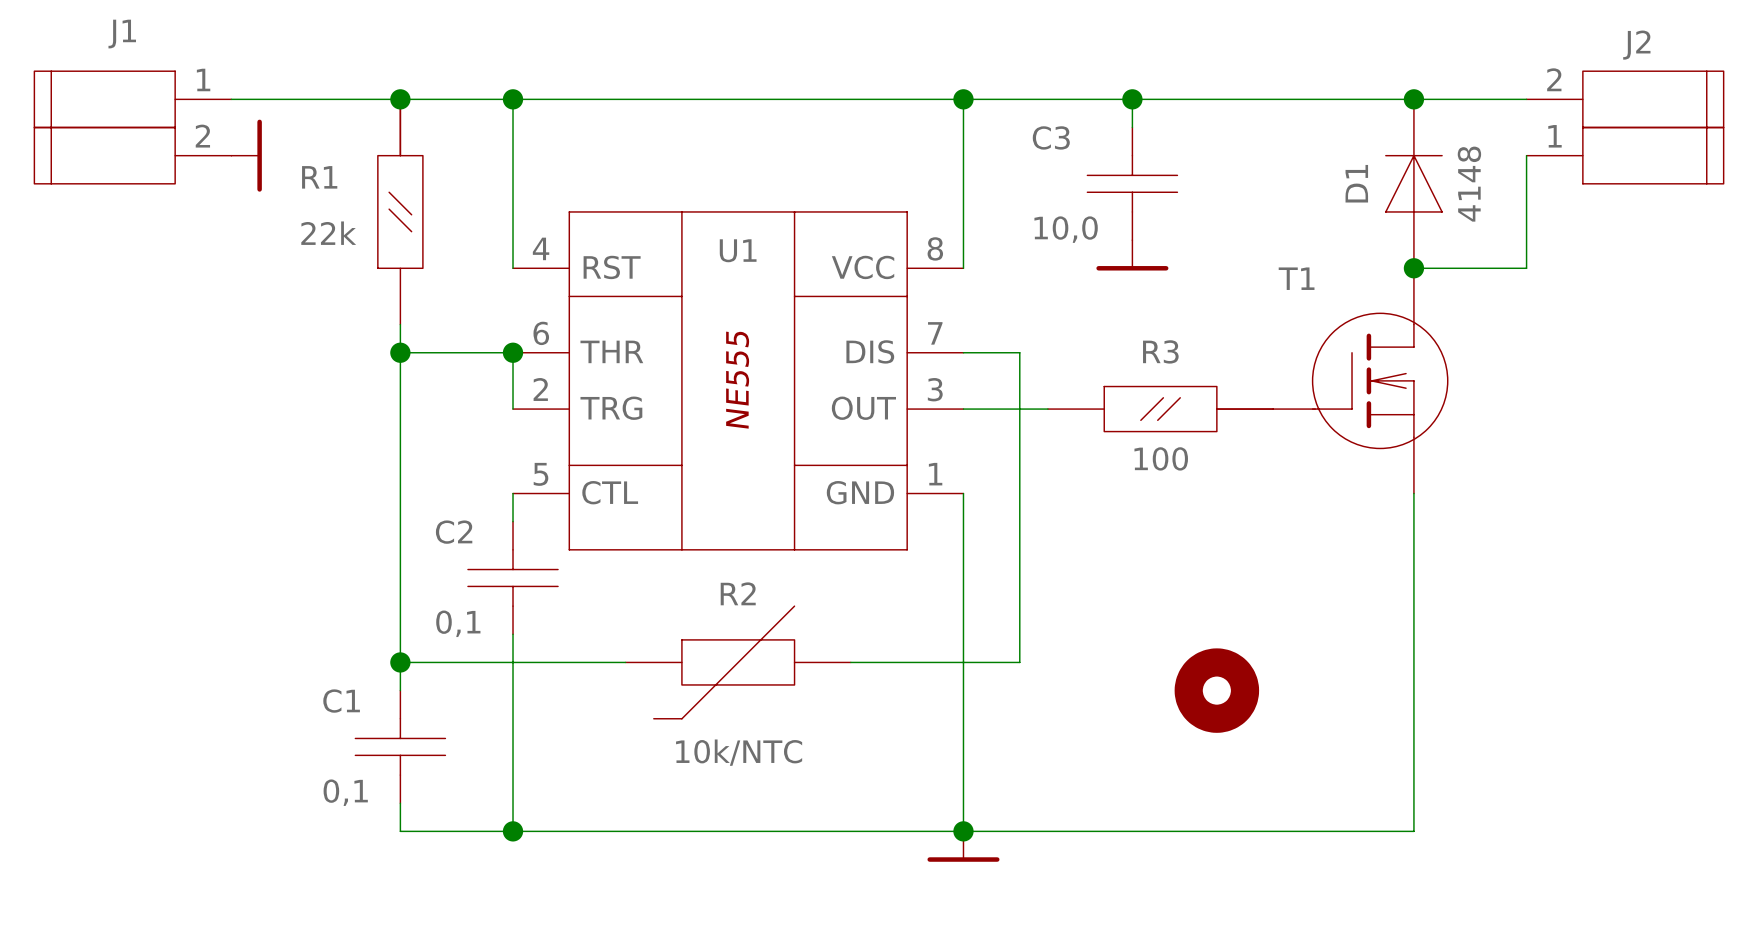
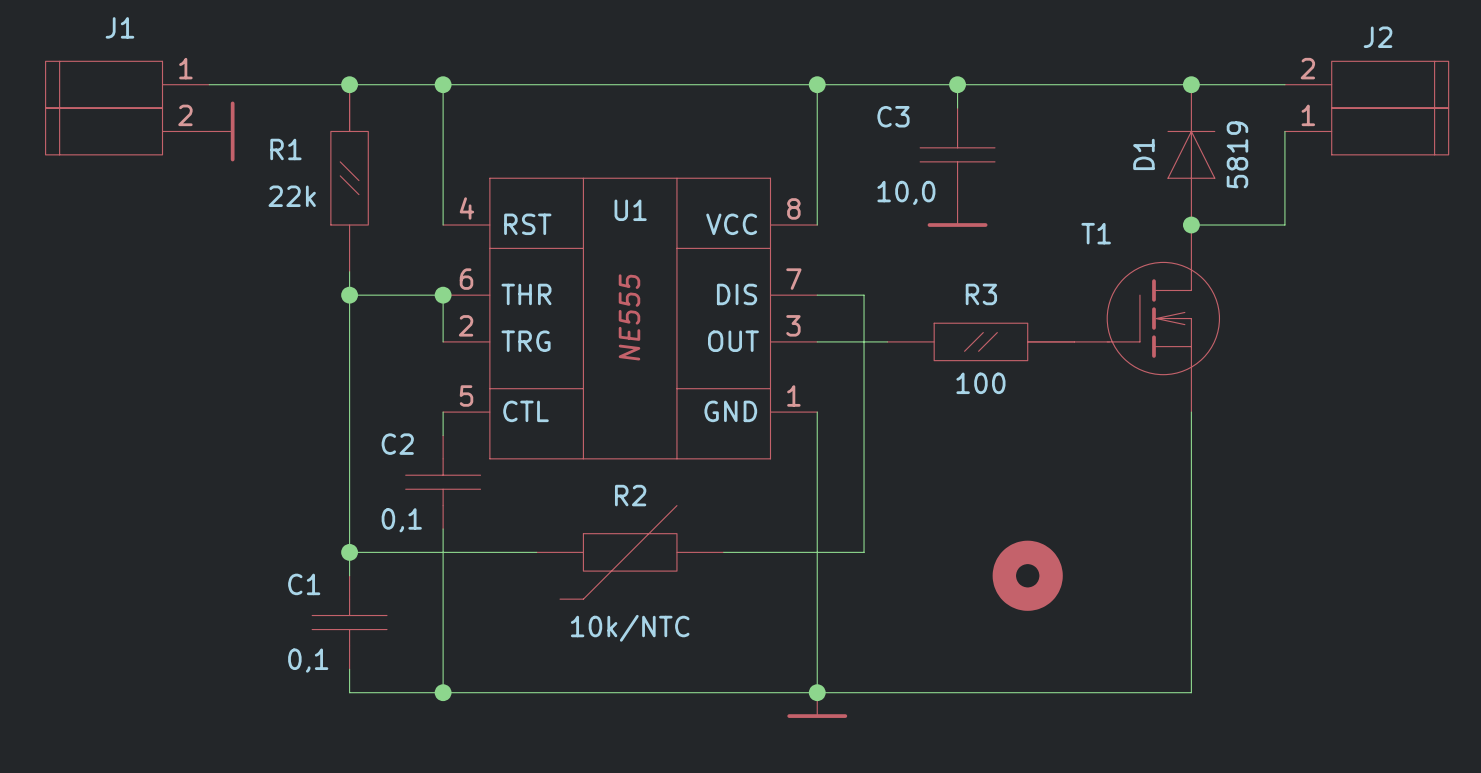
D1 value: 4148 (1469, 184) -> 5819 (1237, 154)

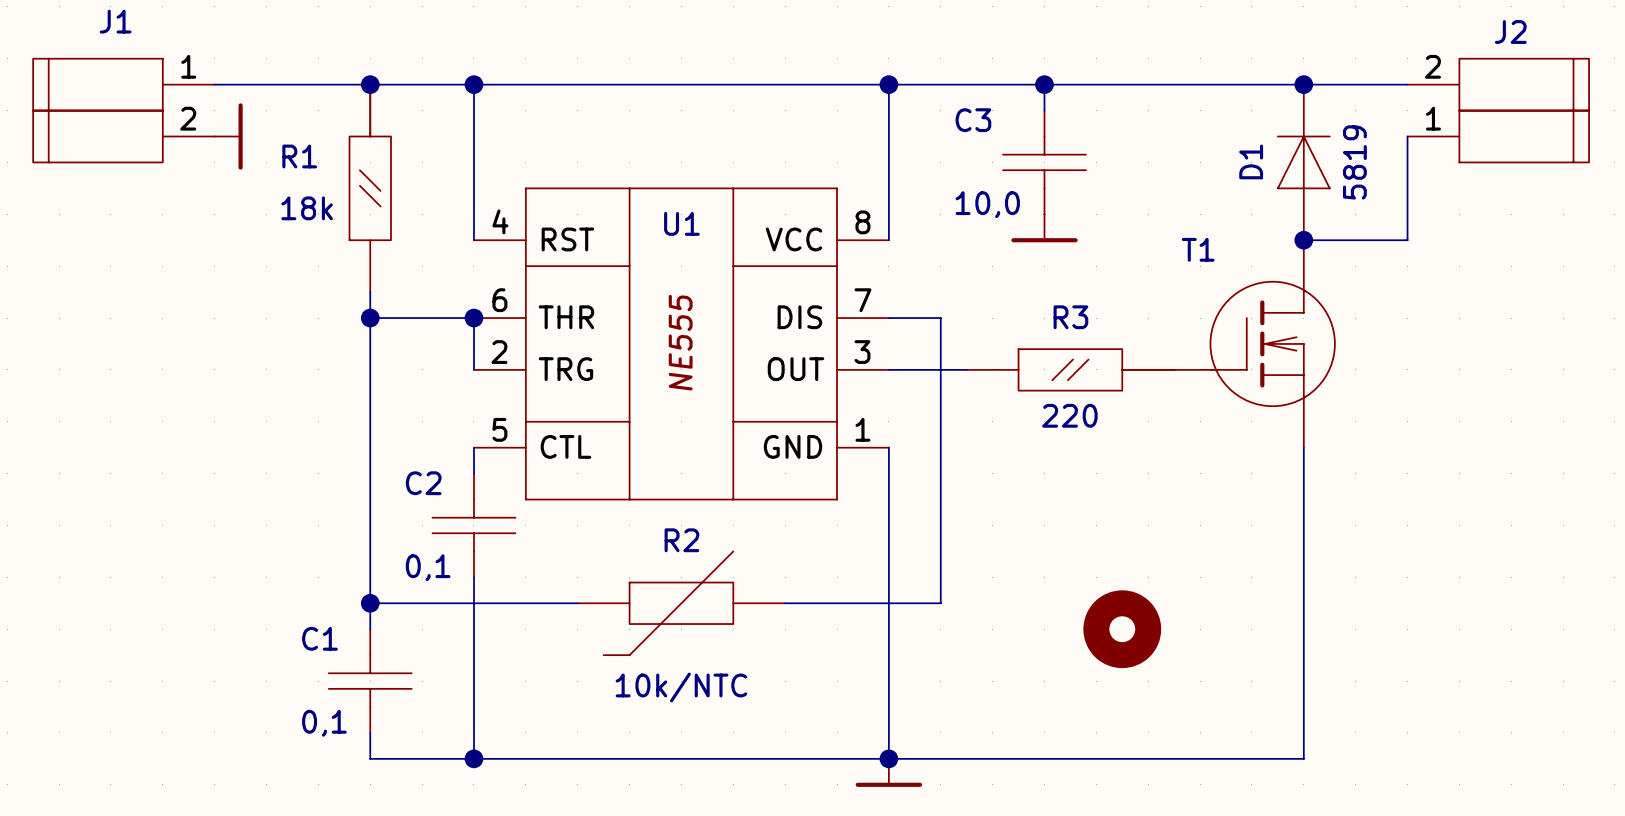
R1 value: 22k (292, 196) -> 18k (307, 208)
R3 value: 100 (980, 383) -> 220 (1069, 415)

